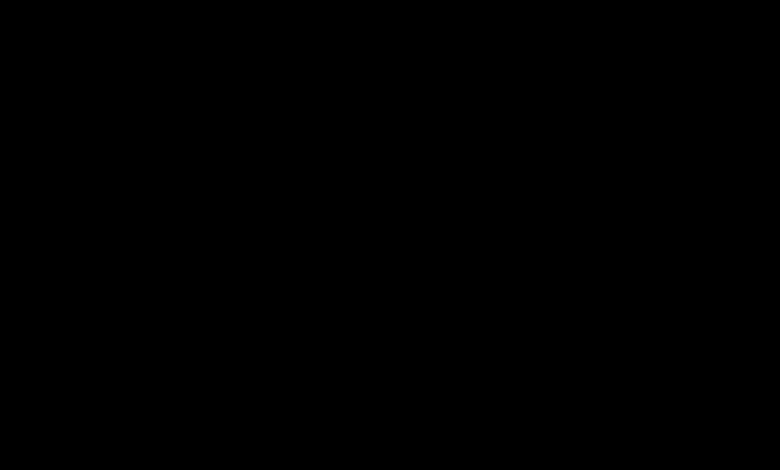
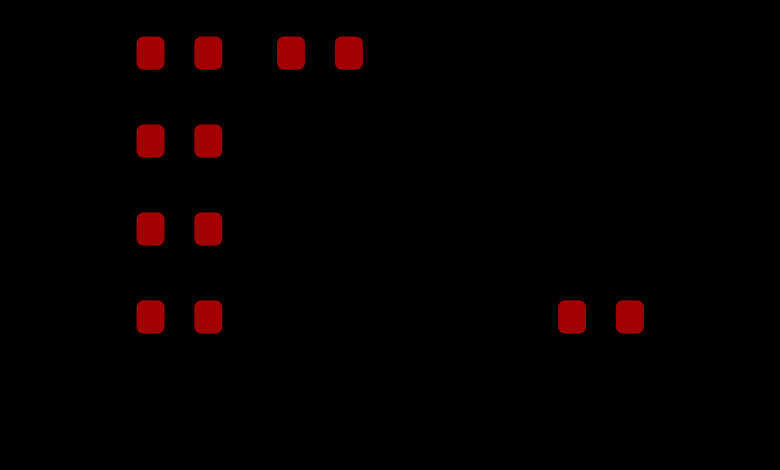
part: none -> (179, 53)
part: none -> (319, 53)
part: none -> (179, 141)
part: none -> (179, 229)
part: none -> (179, 316)
part: none -> (600, 316)

